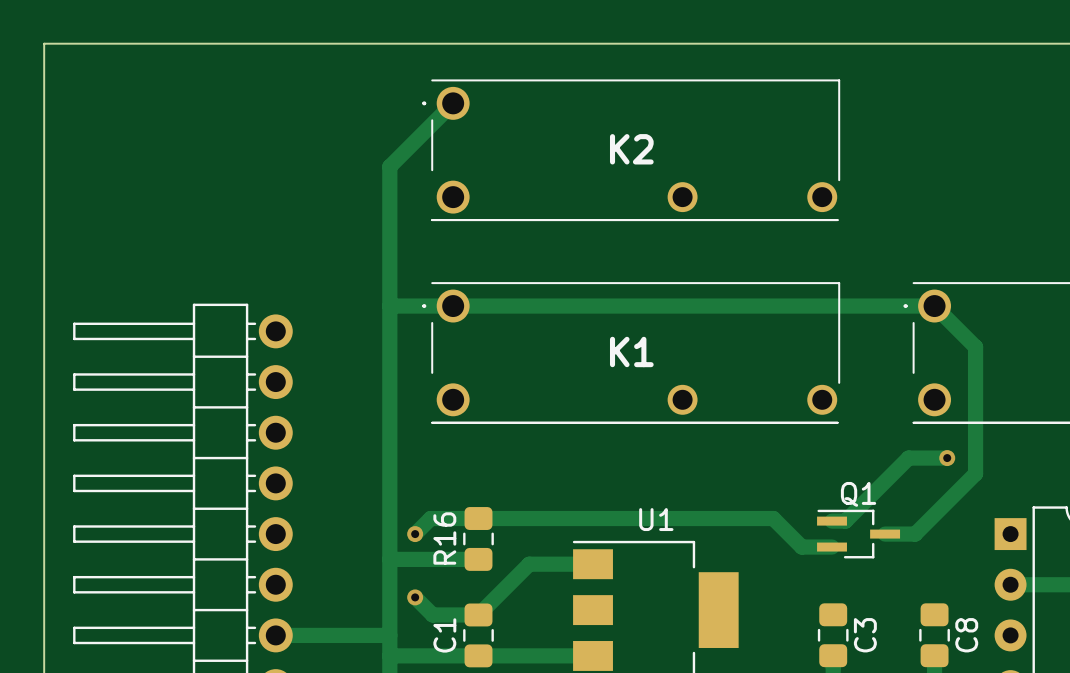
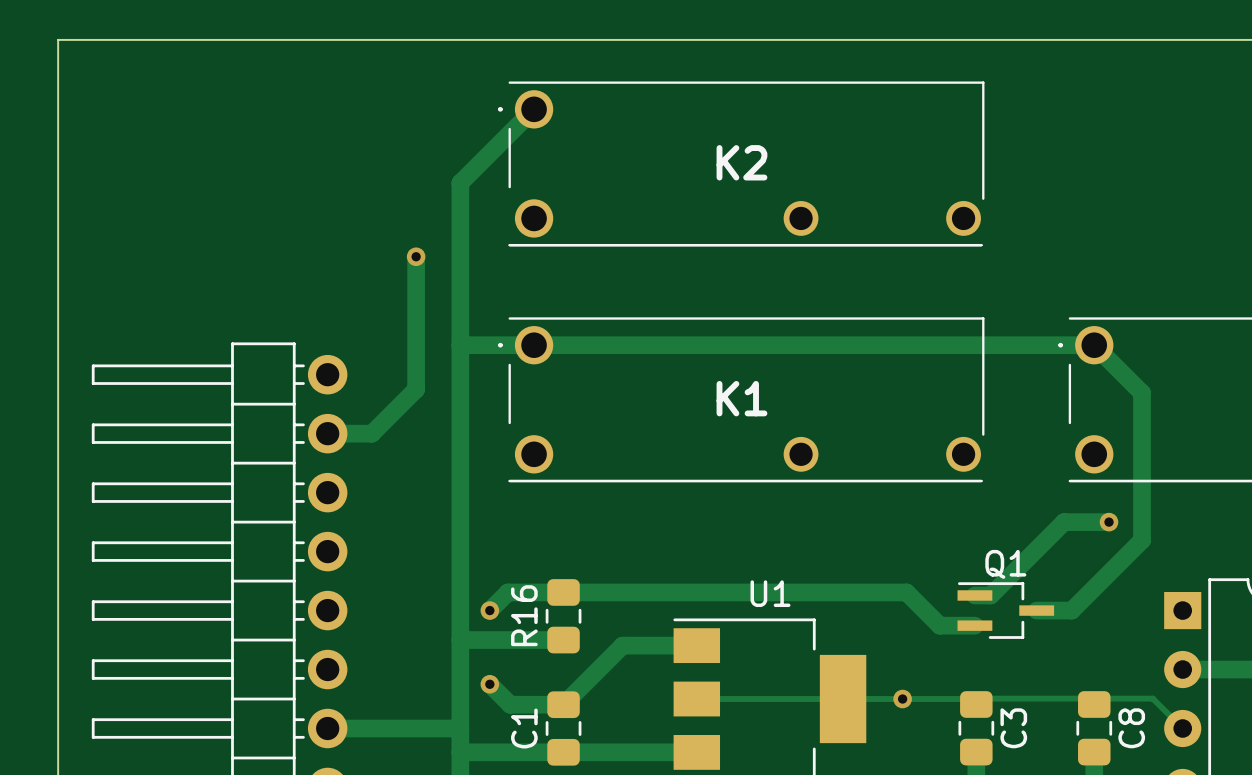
track: none -> (416, 256) (416, 389) (371, 433) (327, 433)
via: none -> (416, 256)
track: none -> (696, 699) (1152, 698) (1182, 728)
via: none -> (902, 699)

